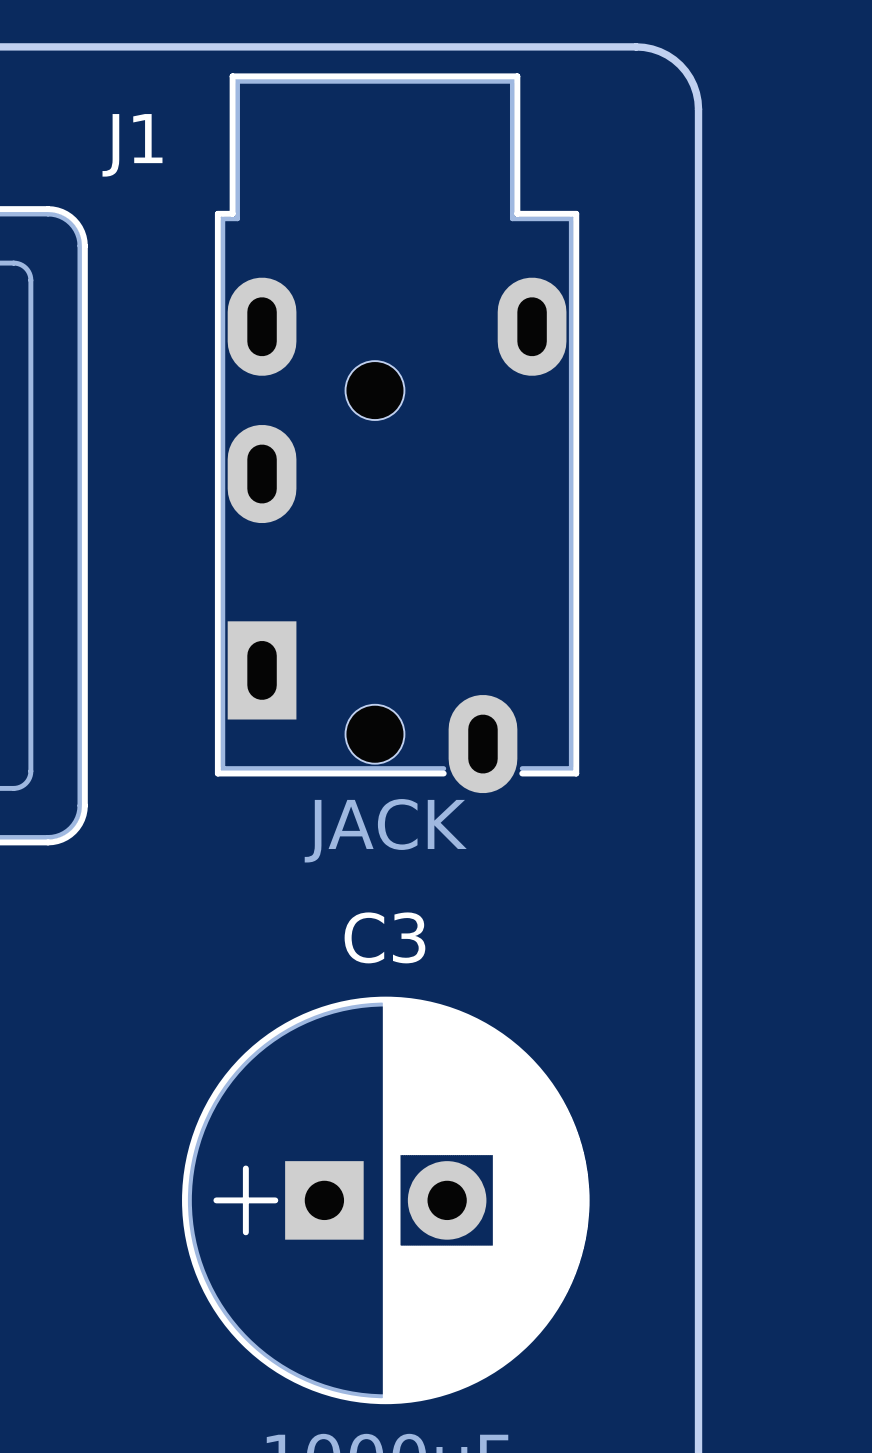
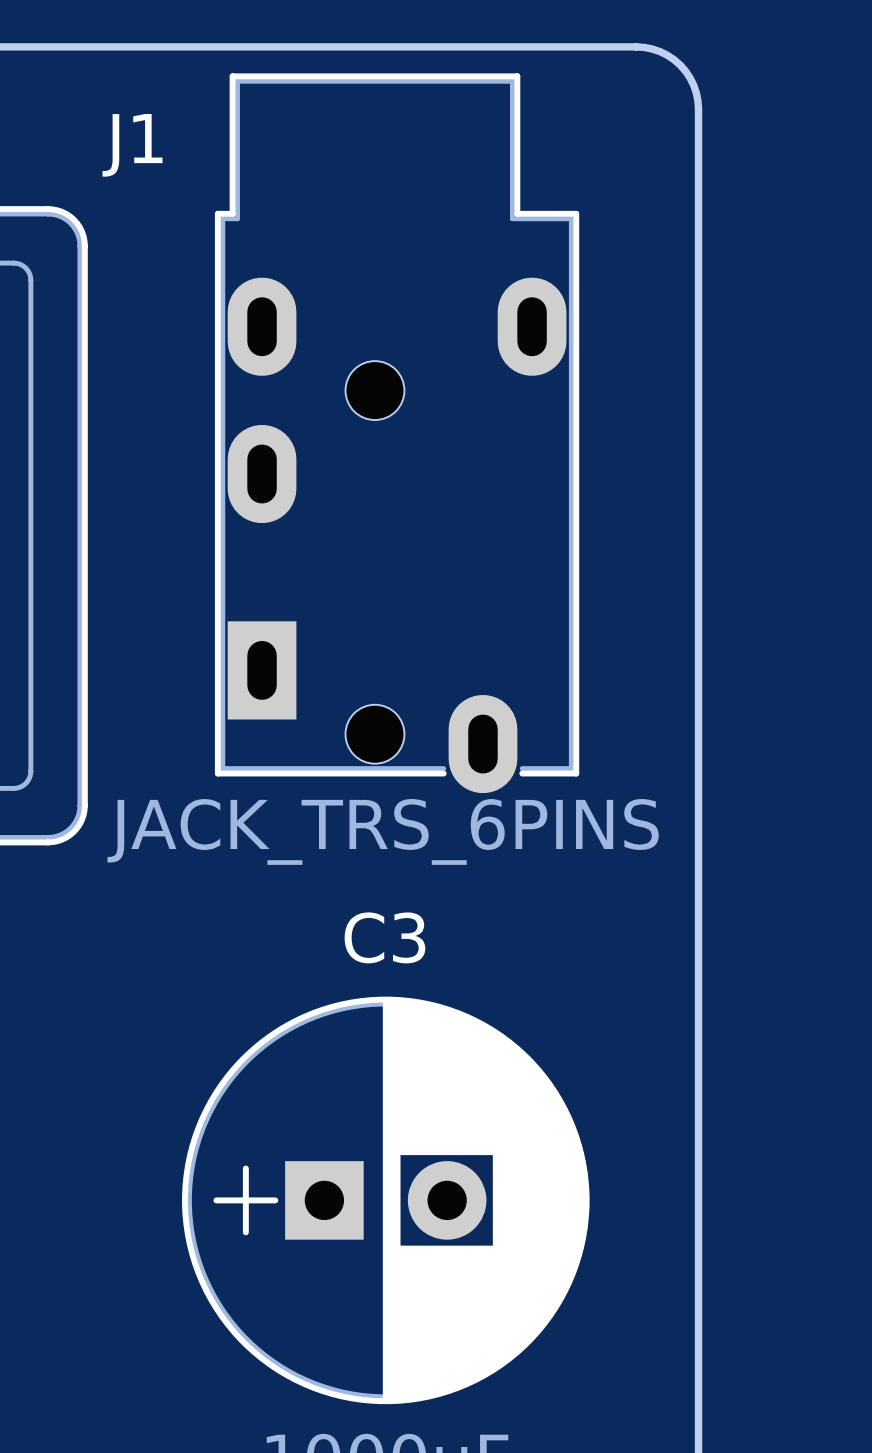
J1 value: JACK (385, 830) -> JACK_TRS_6PINS (383, 831)

